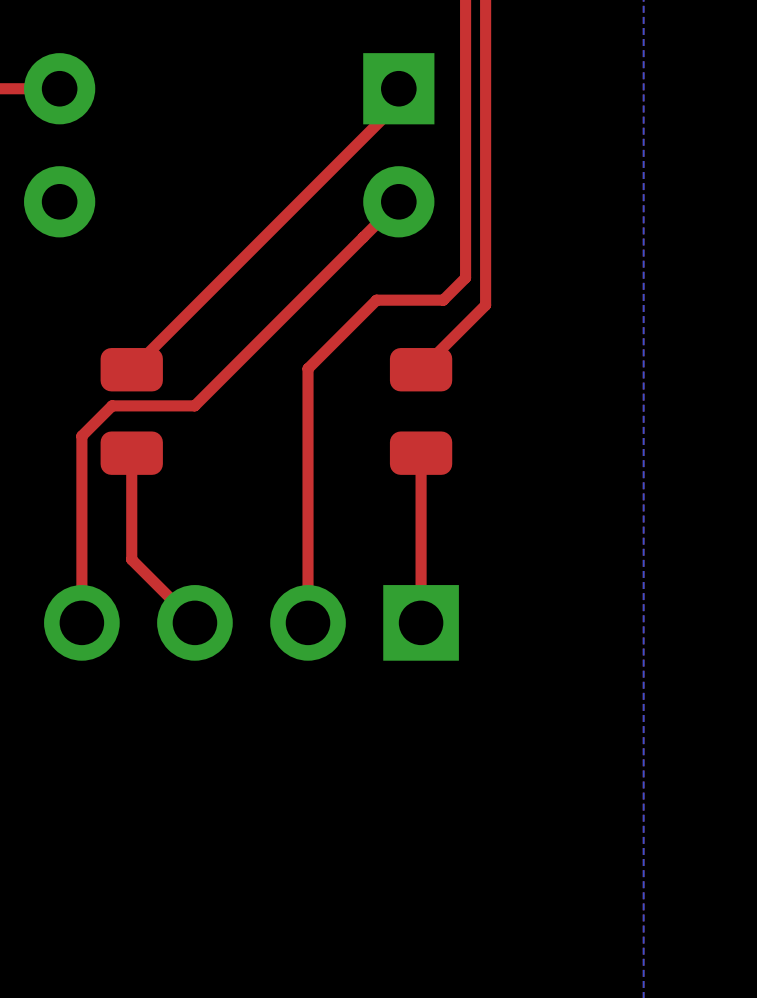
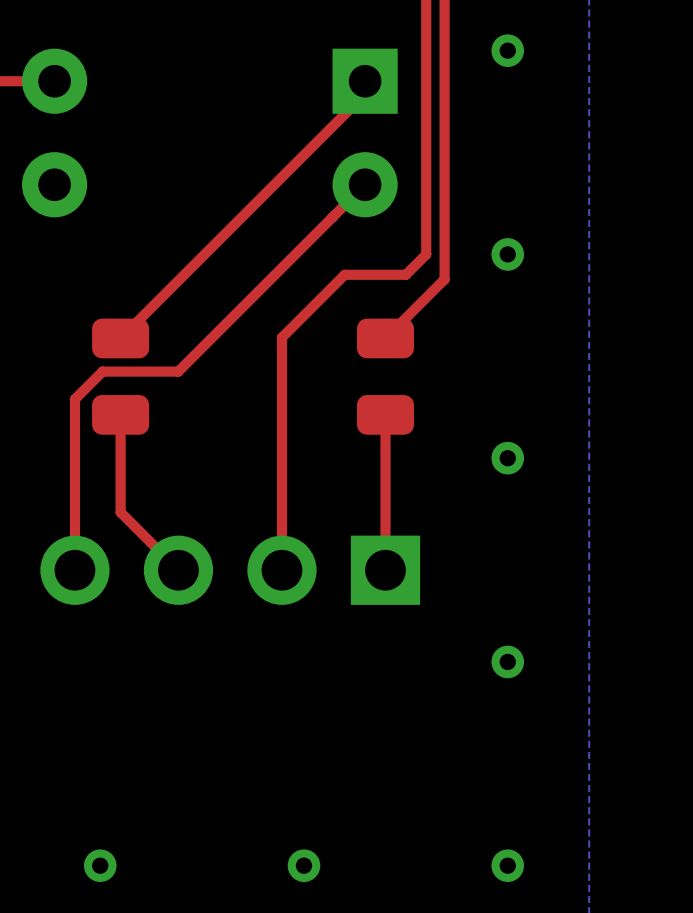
via: none -> (507, 50)
via: none -> (507, 254)
via: none -> (507, 458)
via: none -> (507, 661)
via: none -> (100, 865)
via: none -> (303, 865)
via: none -> (507, 865)

